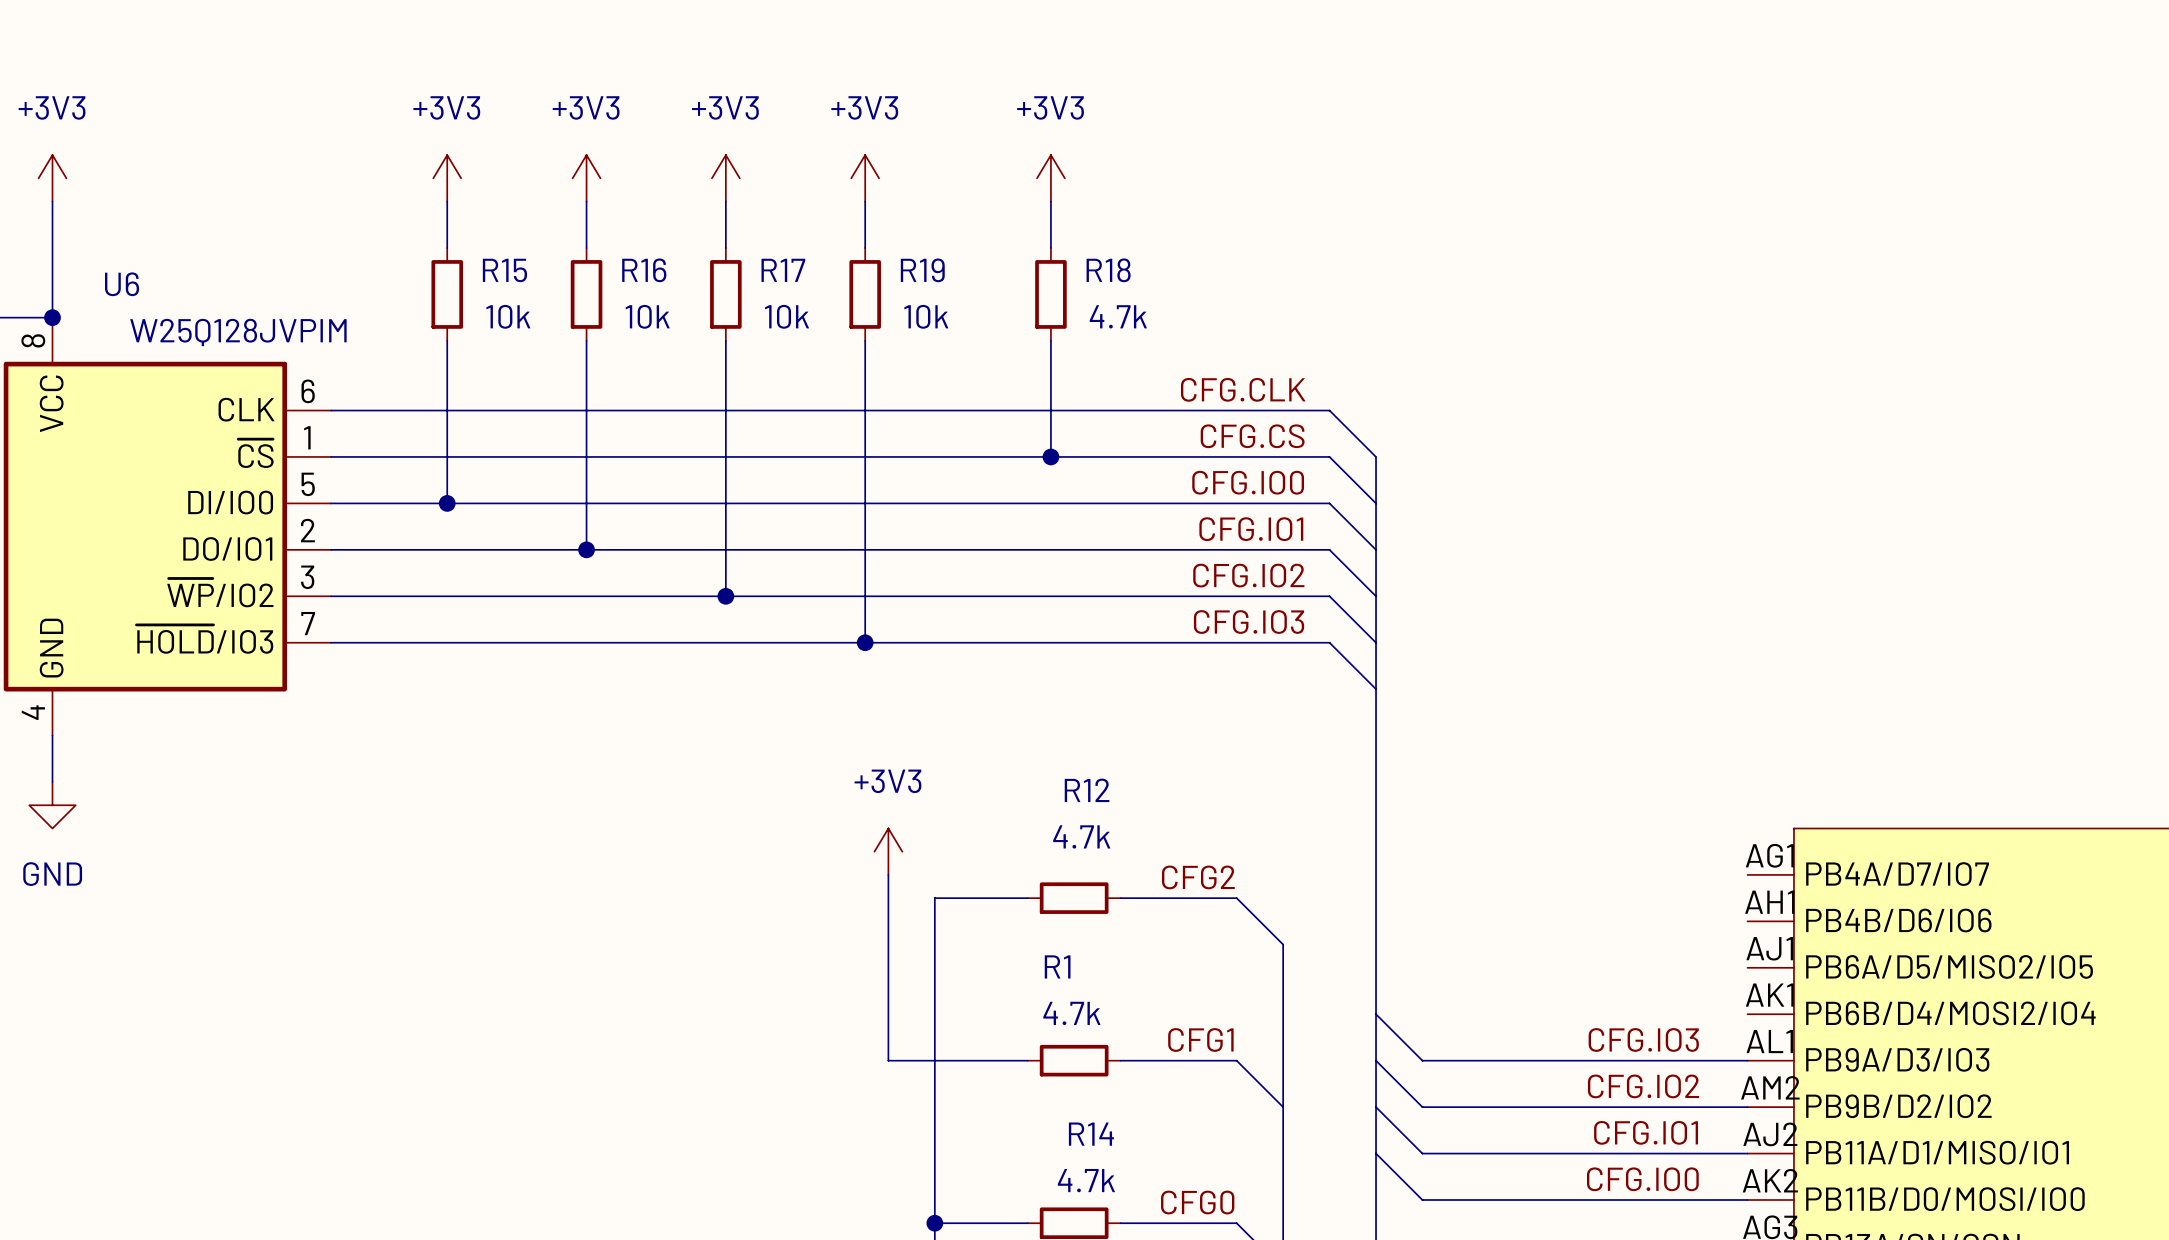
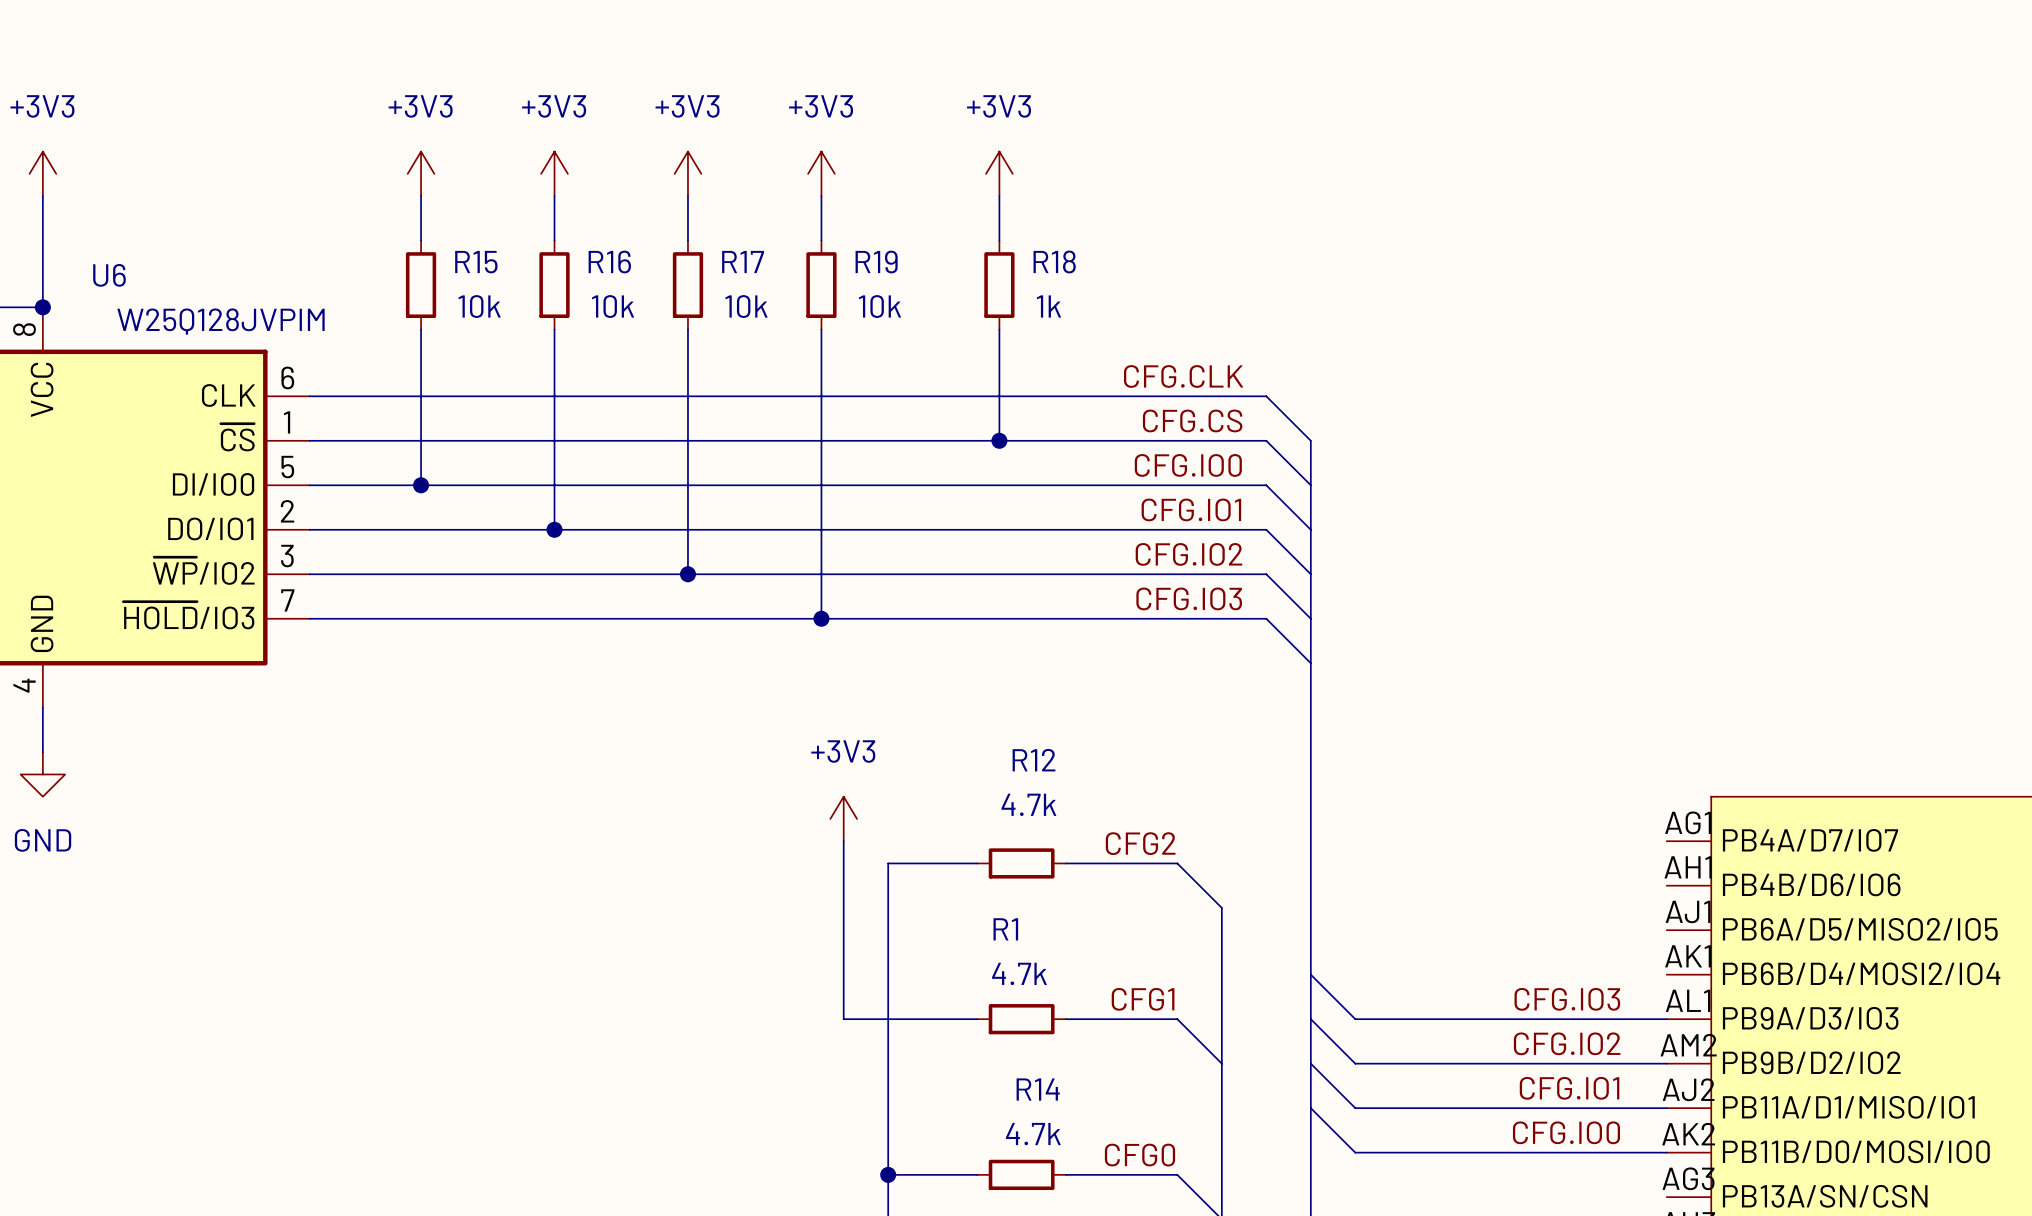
R18 value: 4.7k (1118, 316) -> 1k (1048, 306)

